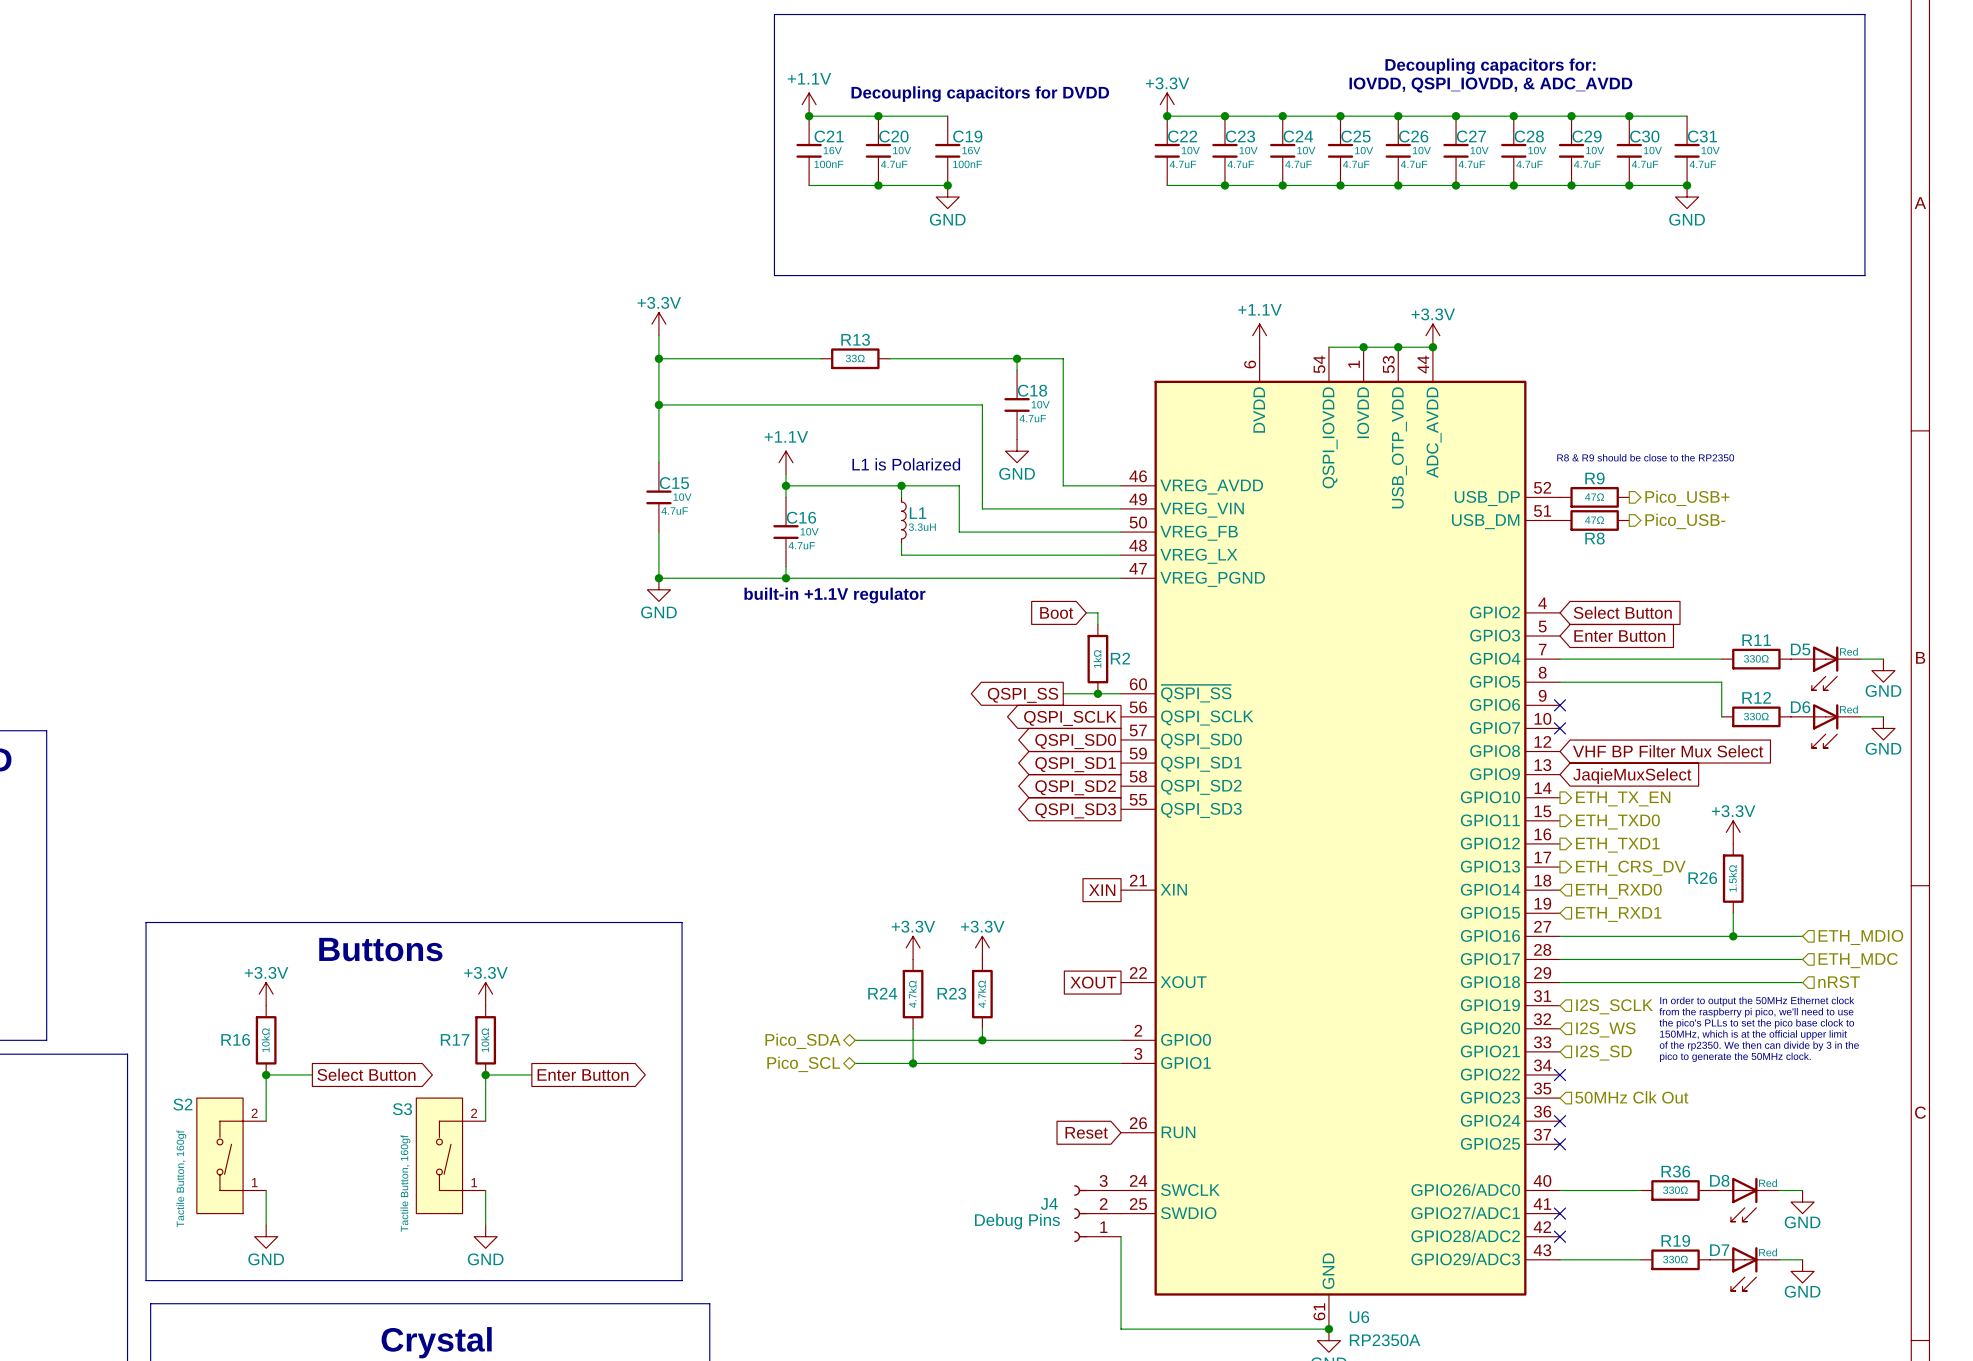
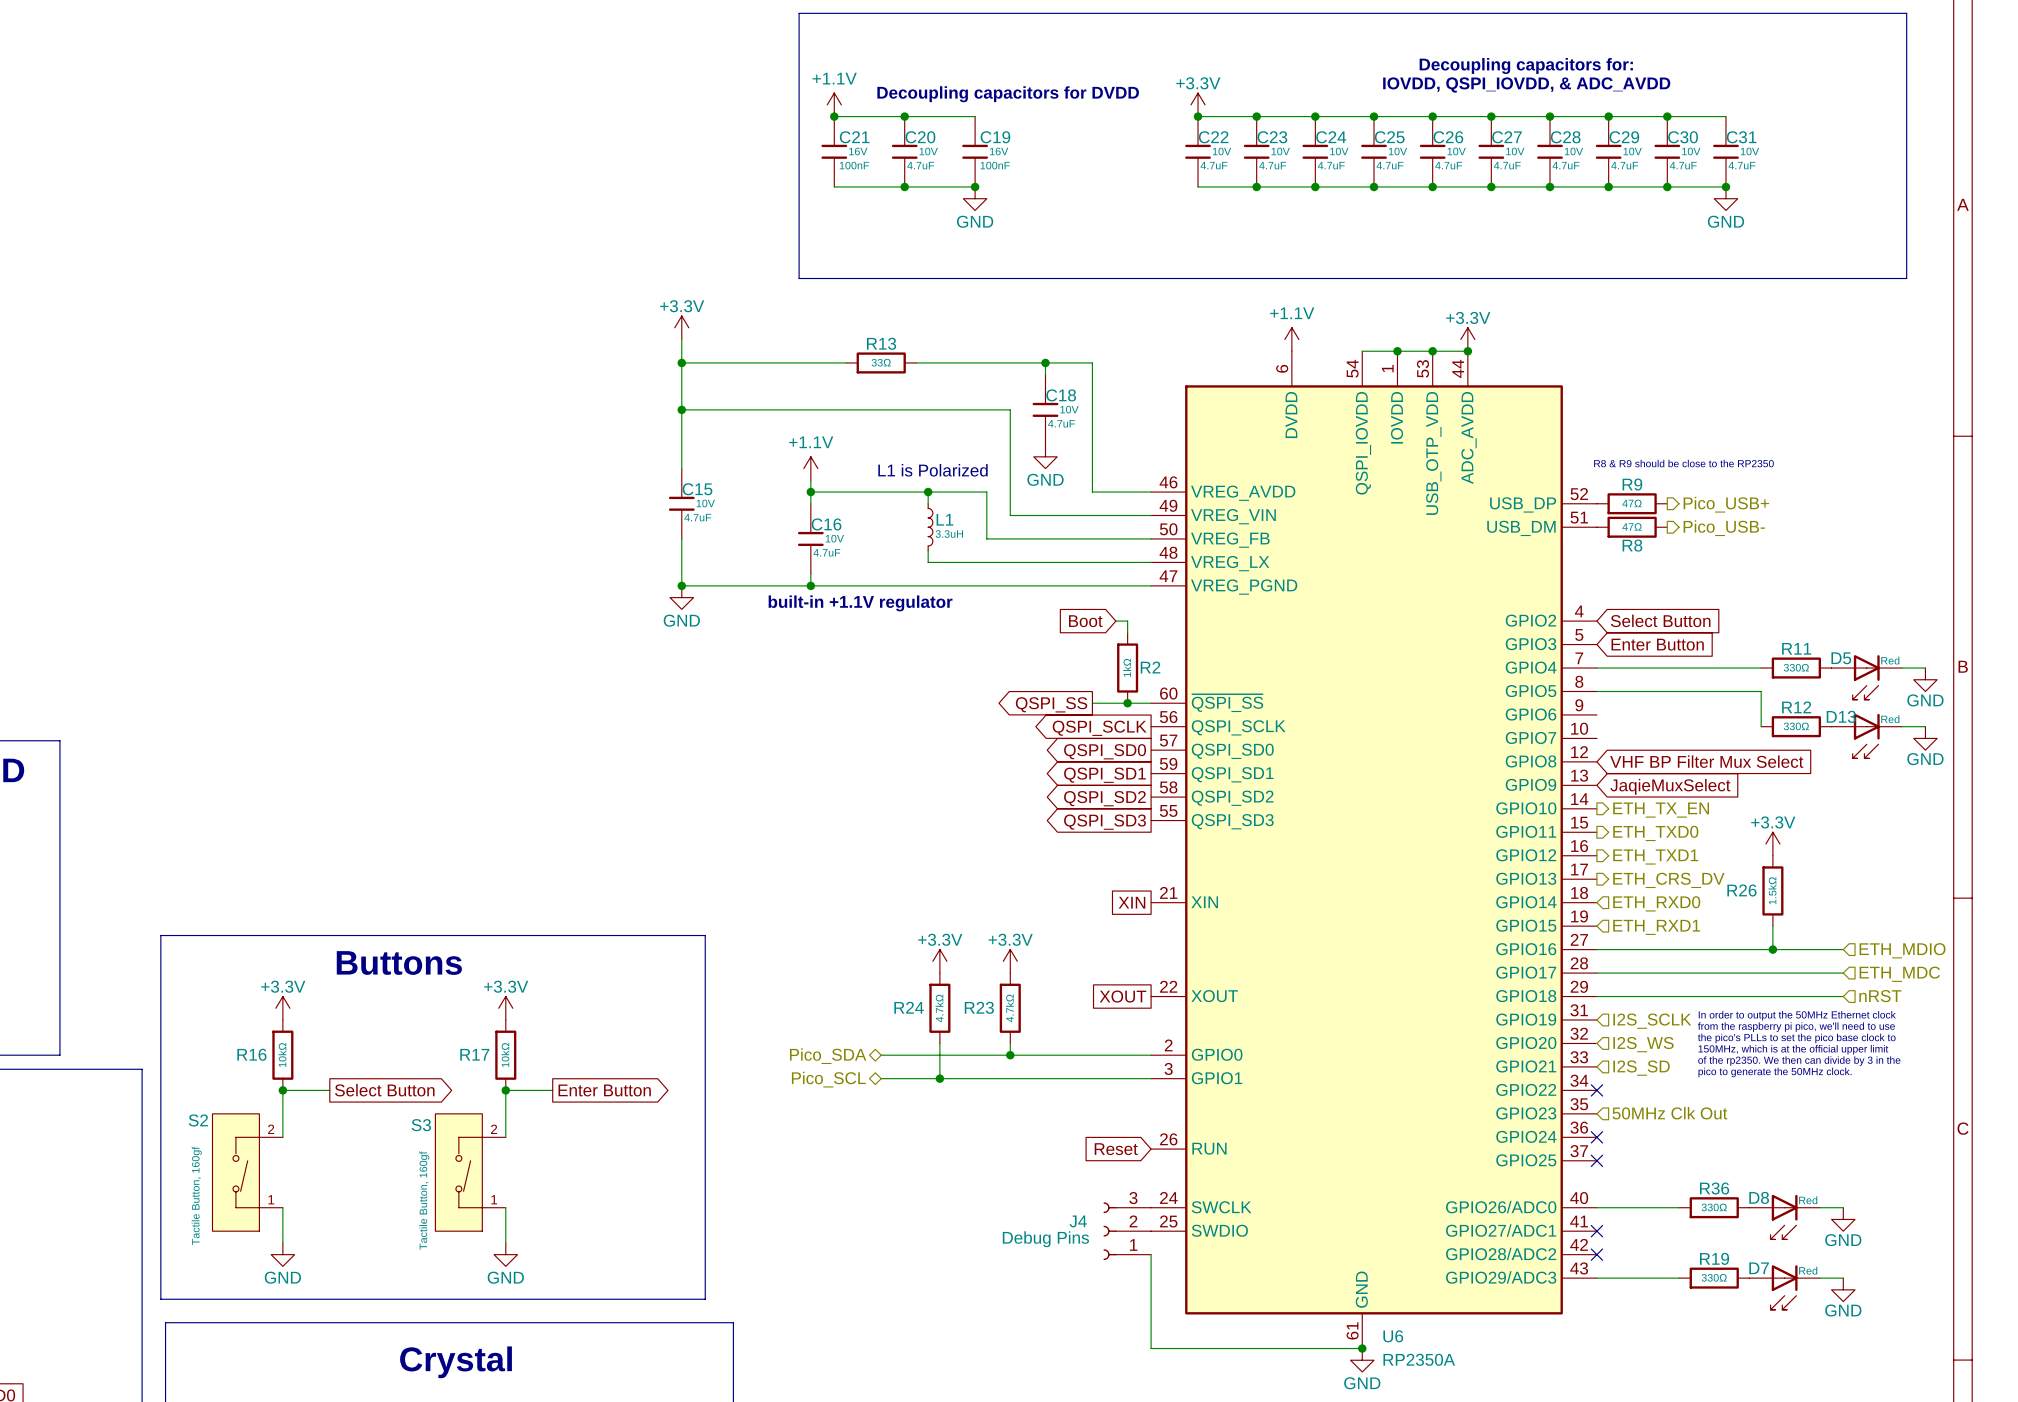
no-connect mark: (1559, 705) -> none
D6 name: D6 (1800, 707) -> D13 (1841, 716)
no-connect mark: (1559, 728) -> none

